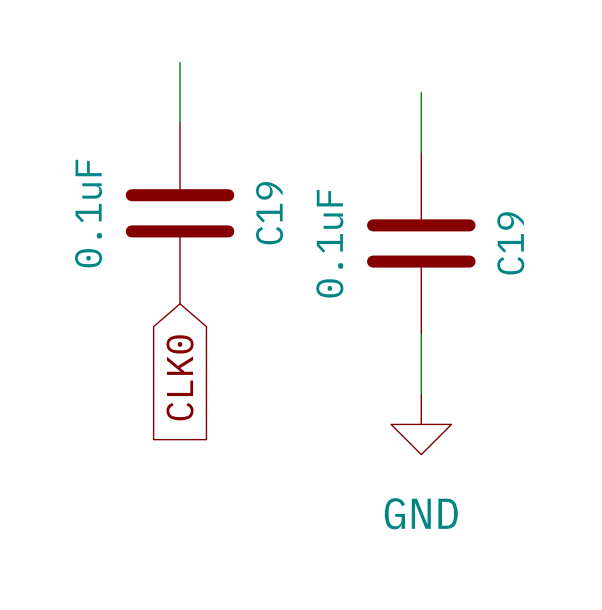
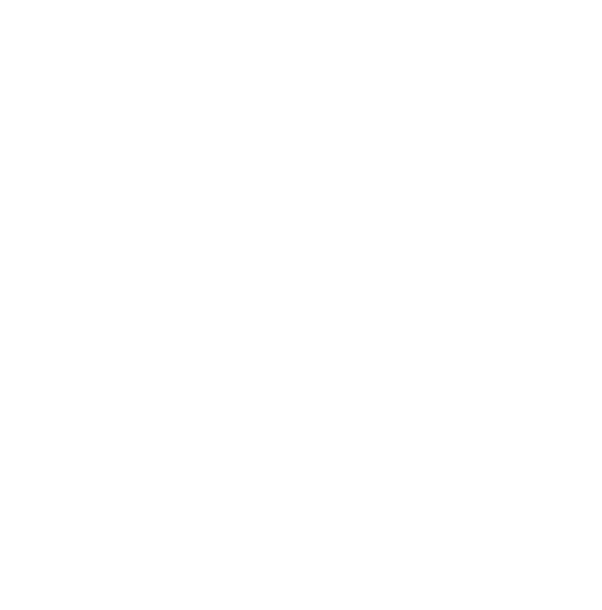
wire: (180, 62) (180, 122) -> none
wire: (421, 92) (421, 152) -> none
C19: 0.1uF (180, 213) -> none
C19: 0.1uF (421, 243) -> none
wire: (421, 333) (421, 394) -> none
global label: CLK0 (180, 377) -> none
power symbol: GND (421, 424) -> none

